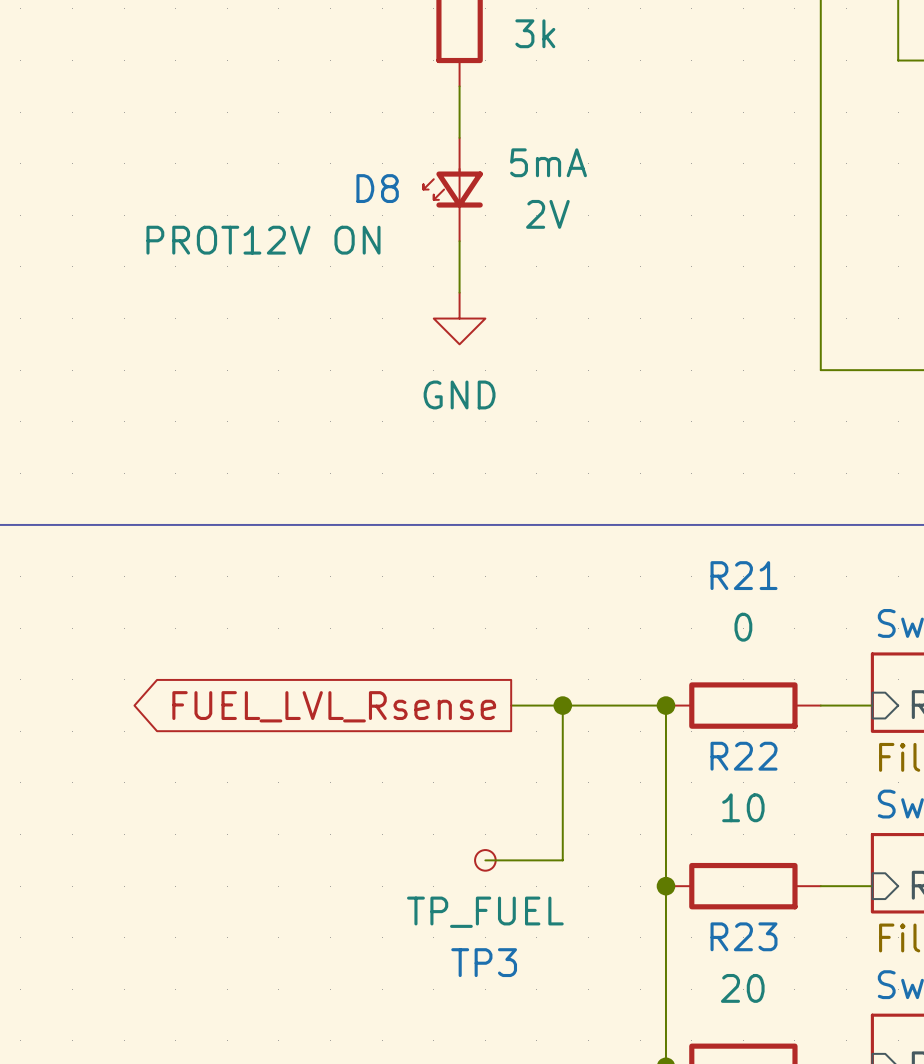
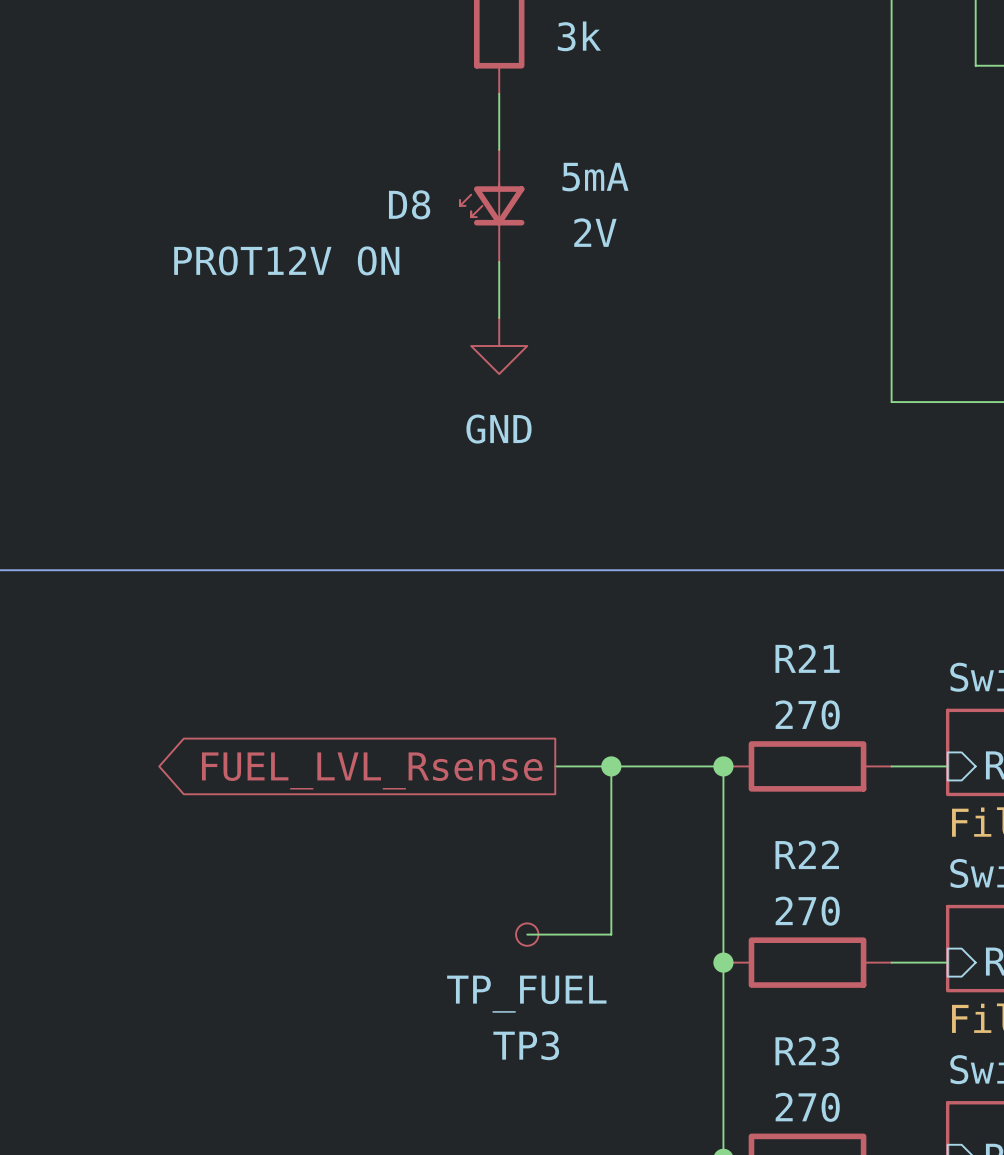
R21 name position: R21 (744, 575) -> R21 (807, 658)
R21 value: 0 (743, 627) -> 270 (807, 714)
R22 name position: R22 (744, 756) -> R22 (807, 854)
R22 value: 10 (743, 807) -> 270 (807, 911)
R23 name position: R23 (744, 936) -> R23 (807, 1051)
R23 value: 20 (742, 988) -> 270 (807, 1107)

